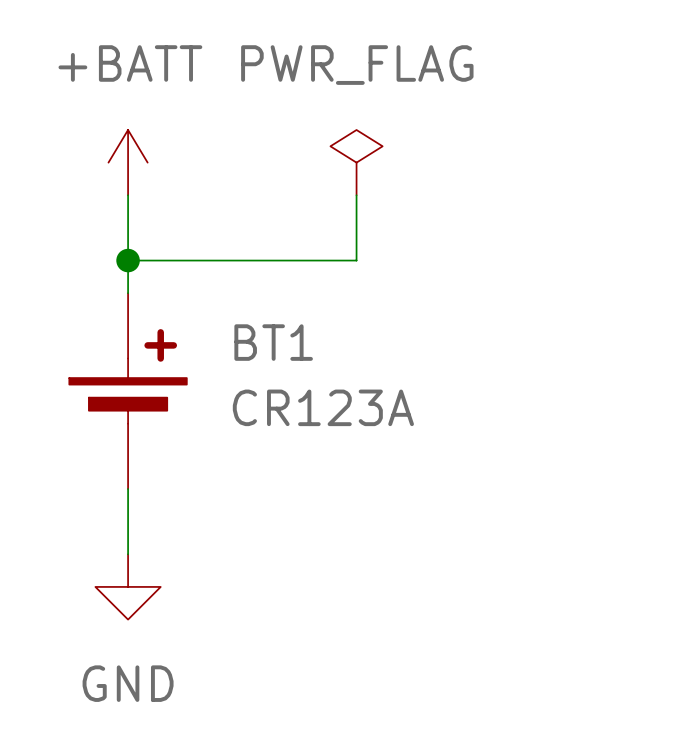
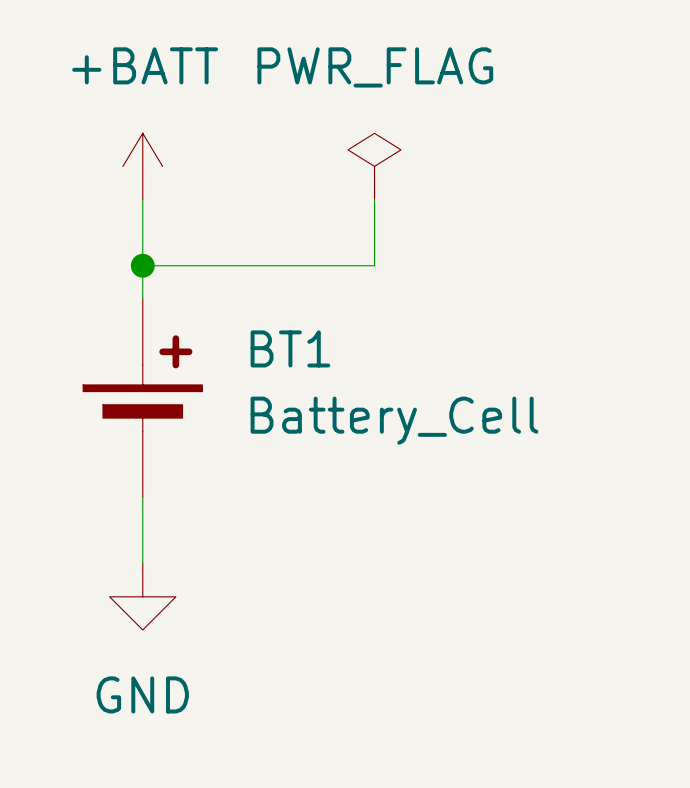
BT1 value: CR123A (323, 407) -> Battery_Cell (394, 420)

